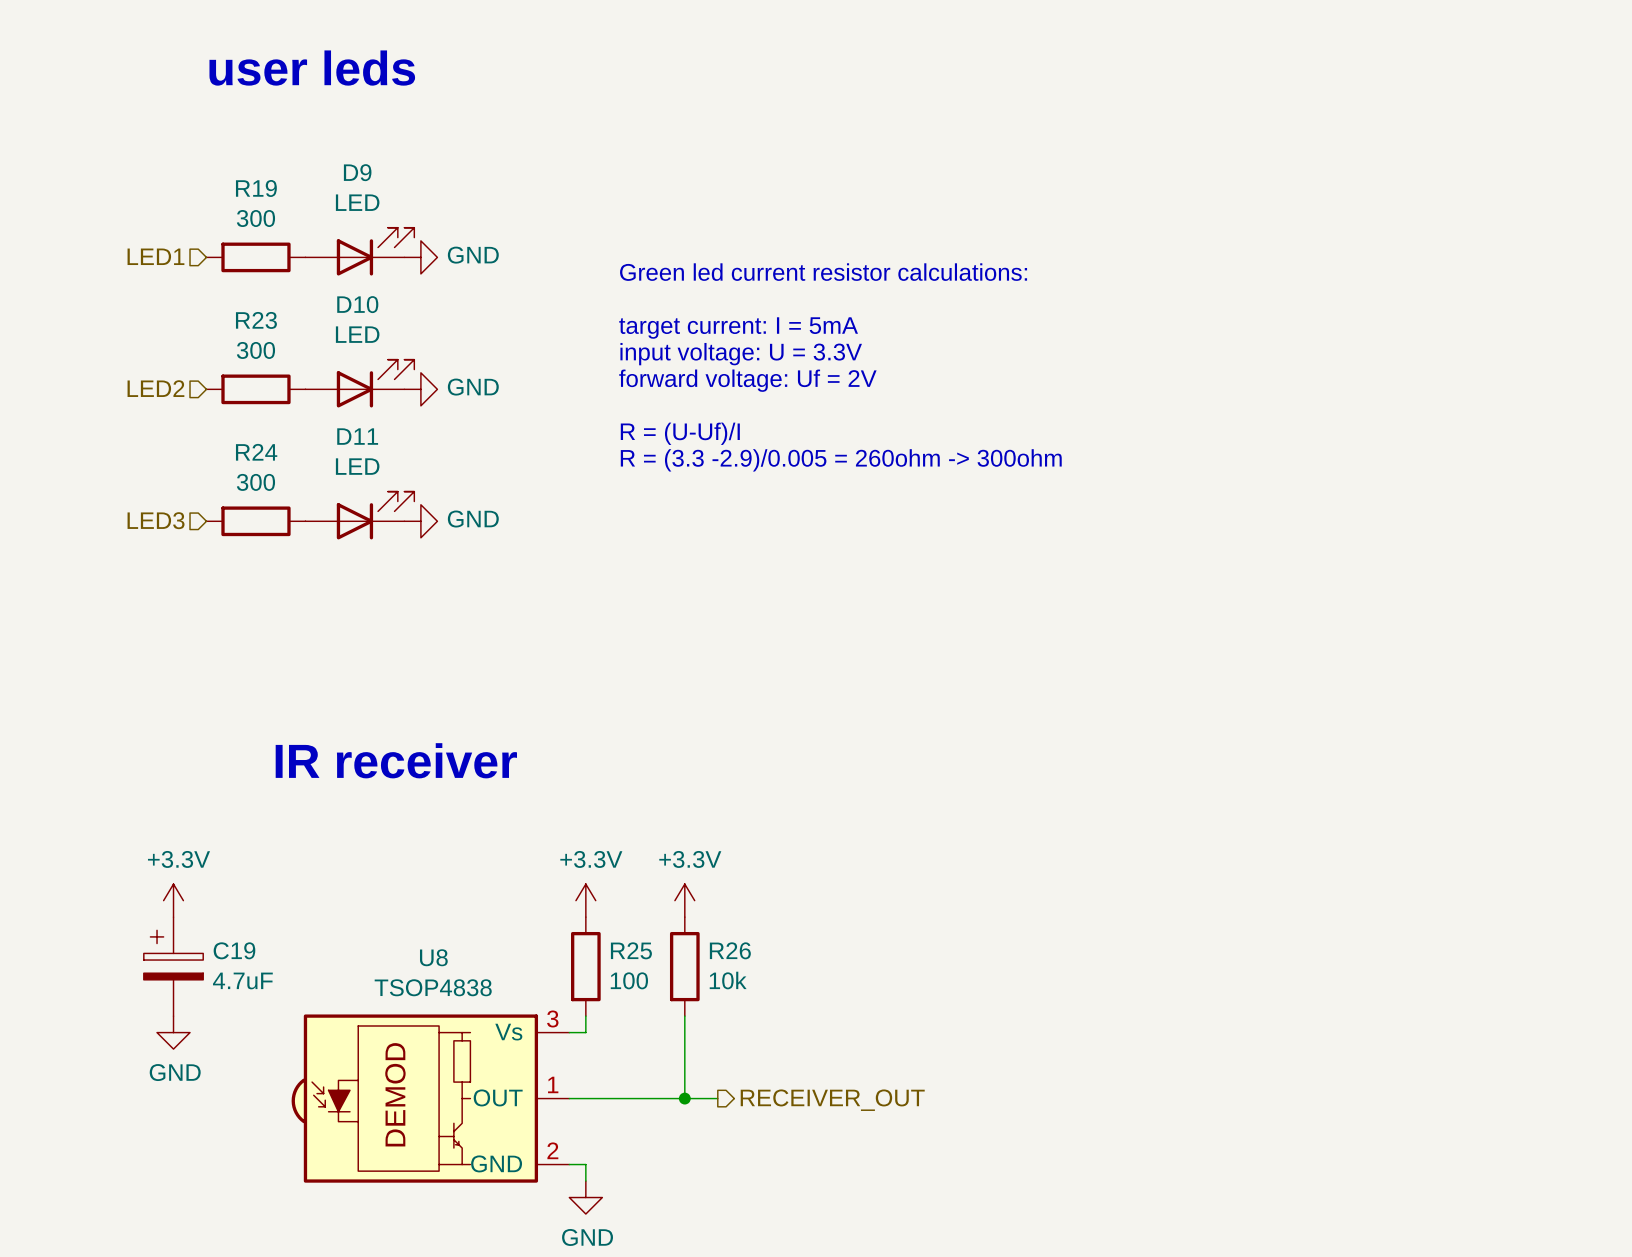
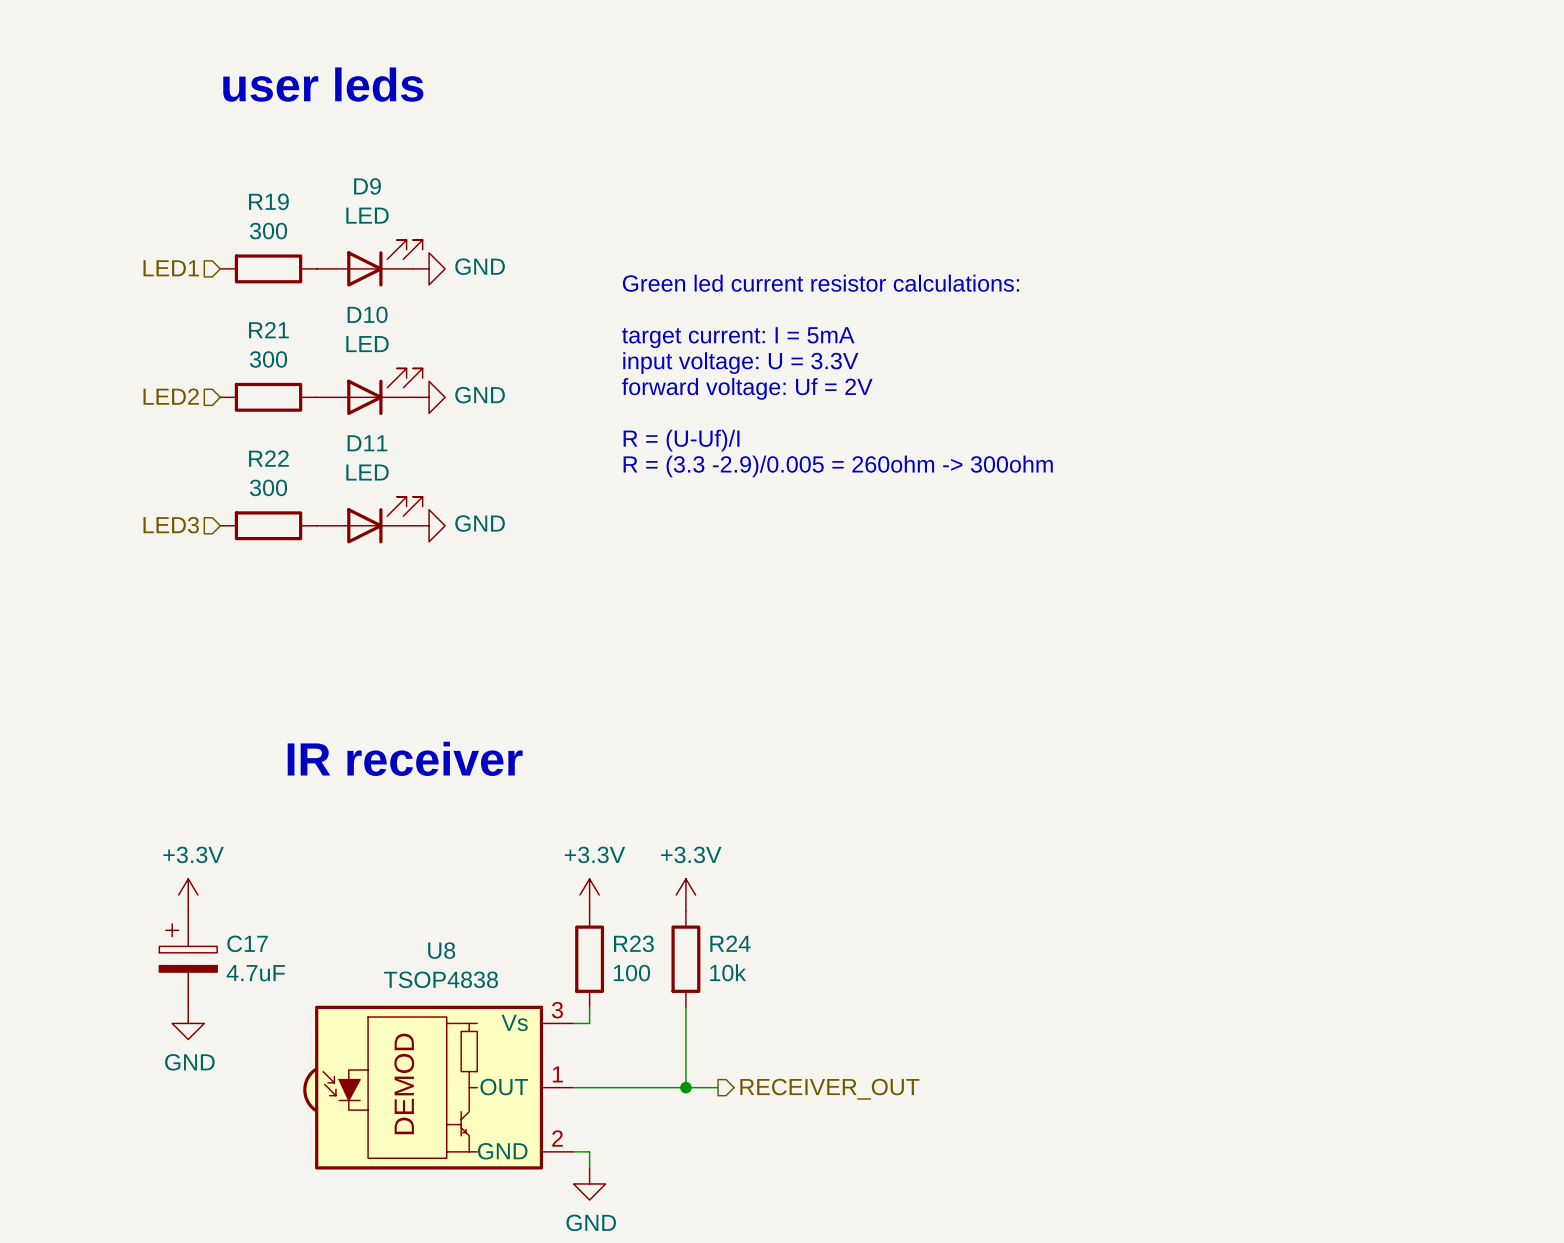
R23 name: R23 (256, 320) -> R21 (268, 330)
R24 name: R24 (256, 452) -> R22 (268, 458)
C19 name: C19 (234, 950) -> C17 (247, 943)
R25 name: R25 (631, 950) -> R23 (633, 943)
R26 name: R26 (730, 950) -> R24 (730, 943)

